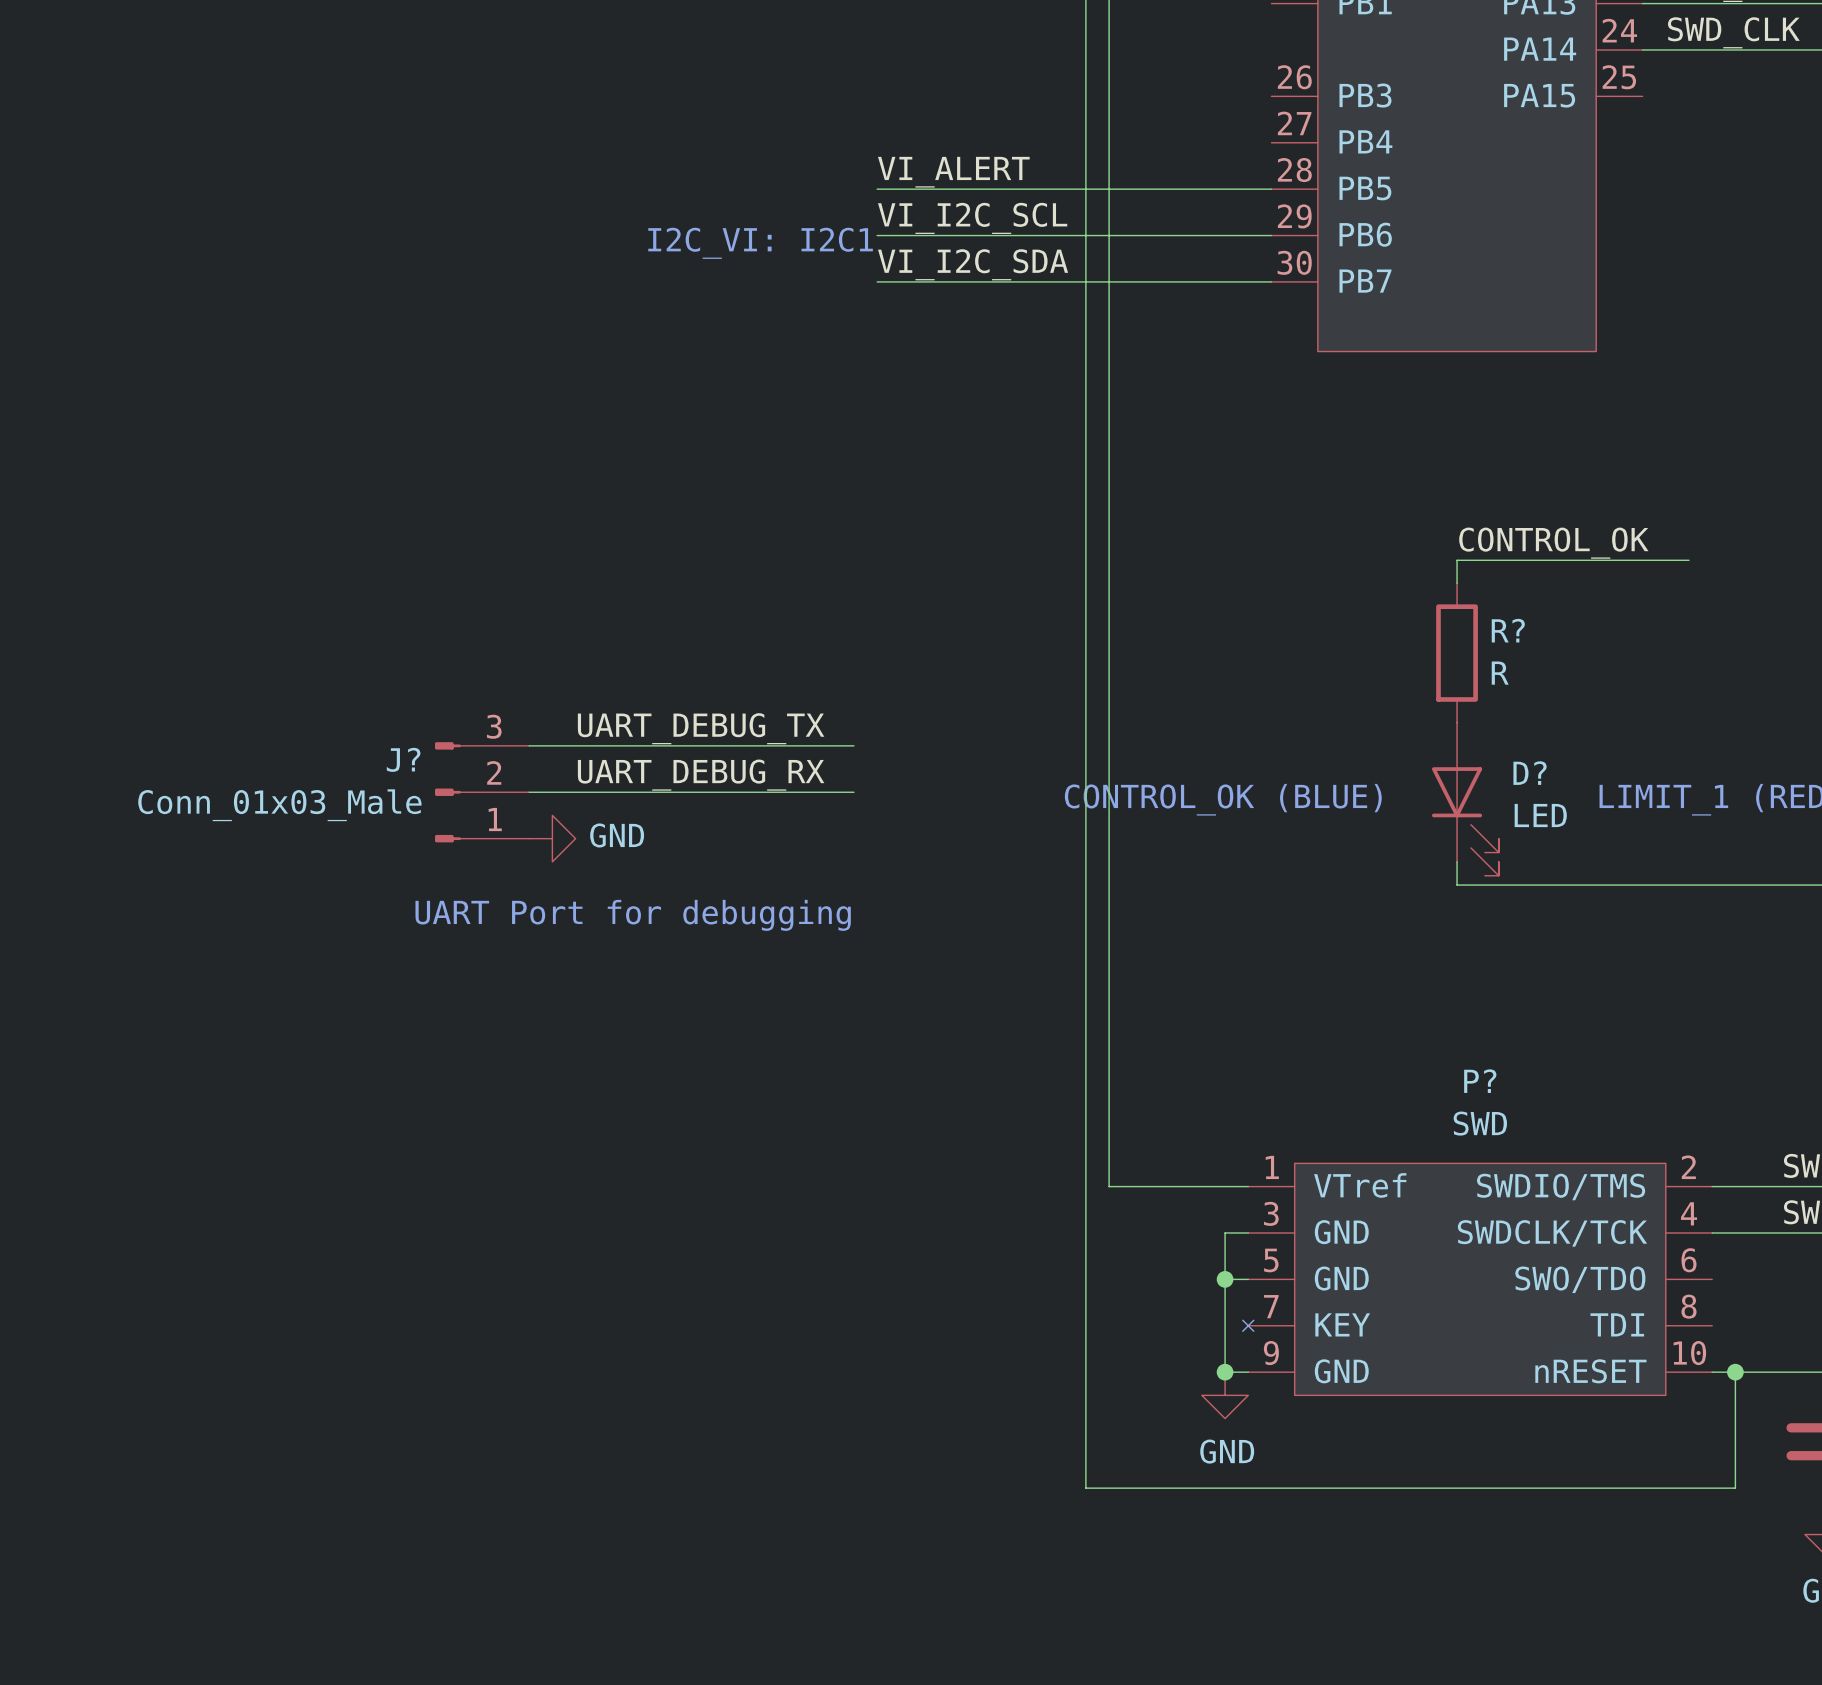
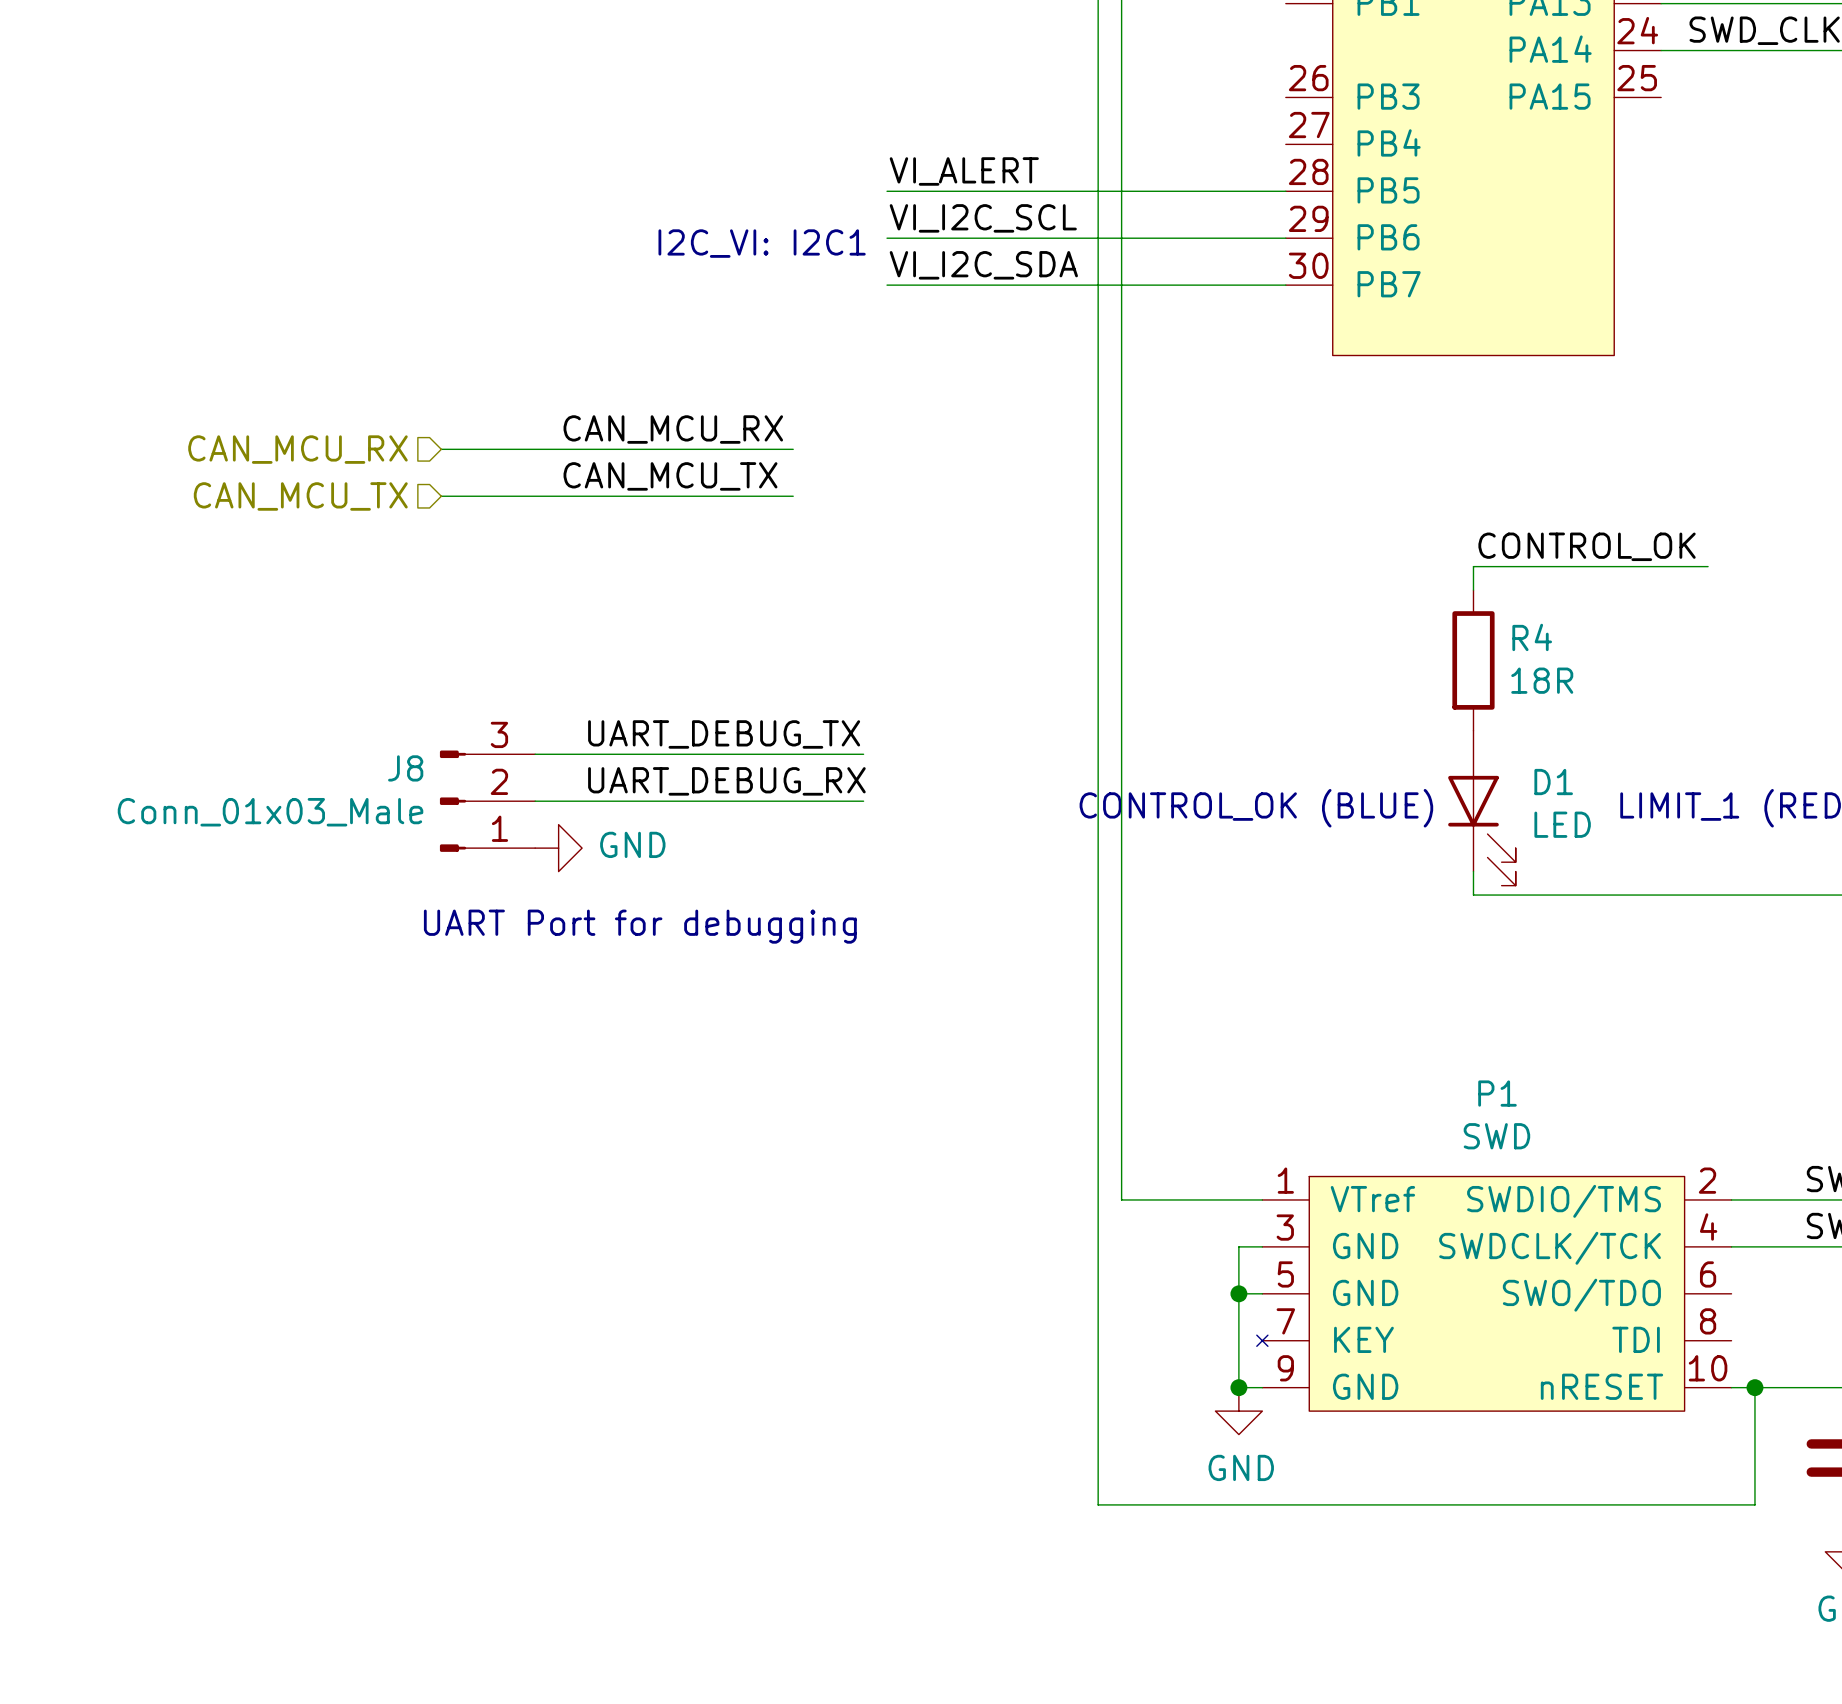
label: none -> CAN_MCU_RX (673, 429)
wire: none -> (441, 449) (793, 449)
hierarchical label: none -> CAN_MCU_RX (297, 449)
label: none -> CAN_MCU_TX (670, 476)
wire: none -> (441, 496) (793, 496)
hierarchical label: none -> CAN_MCU_TX (300, 496)
R? name: R? (1508, 630) -> R4 (1532, 637)
R? value: R (1500, 673) -> 18R (1542, 680)
J? name: J? (403, 759) -> J8 (405, 768)
D? name: D? (1530, 773) -> D1 (1553, 782)
P? name: P? (1480, 1081) -> P1 (1497, 1093)

